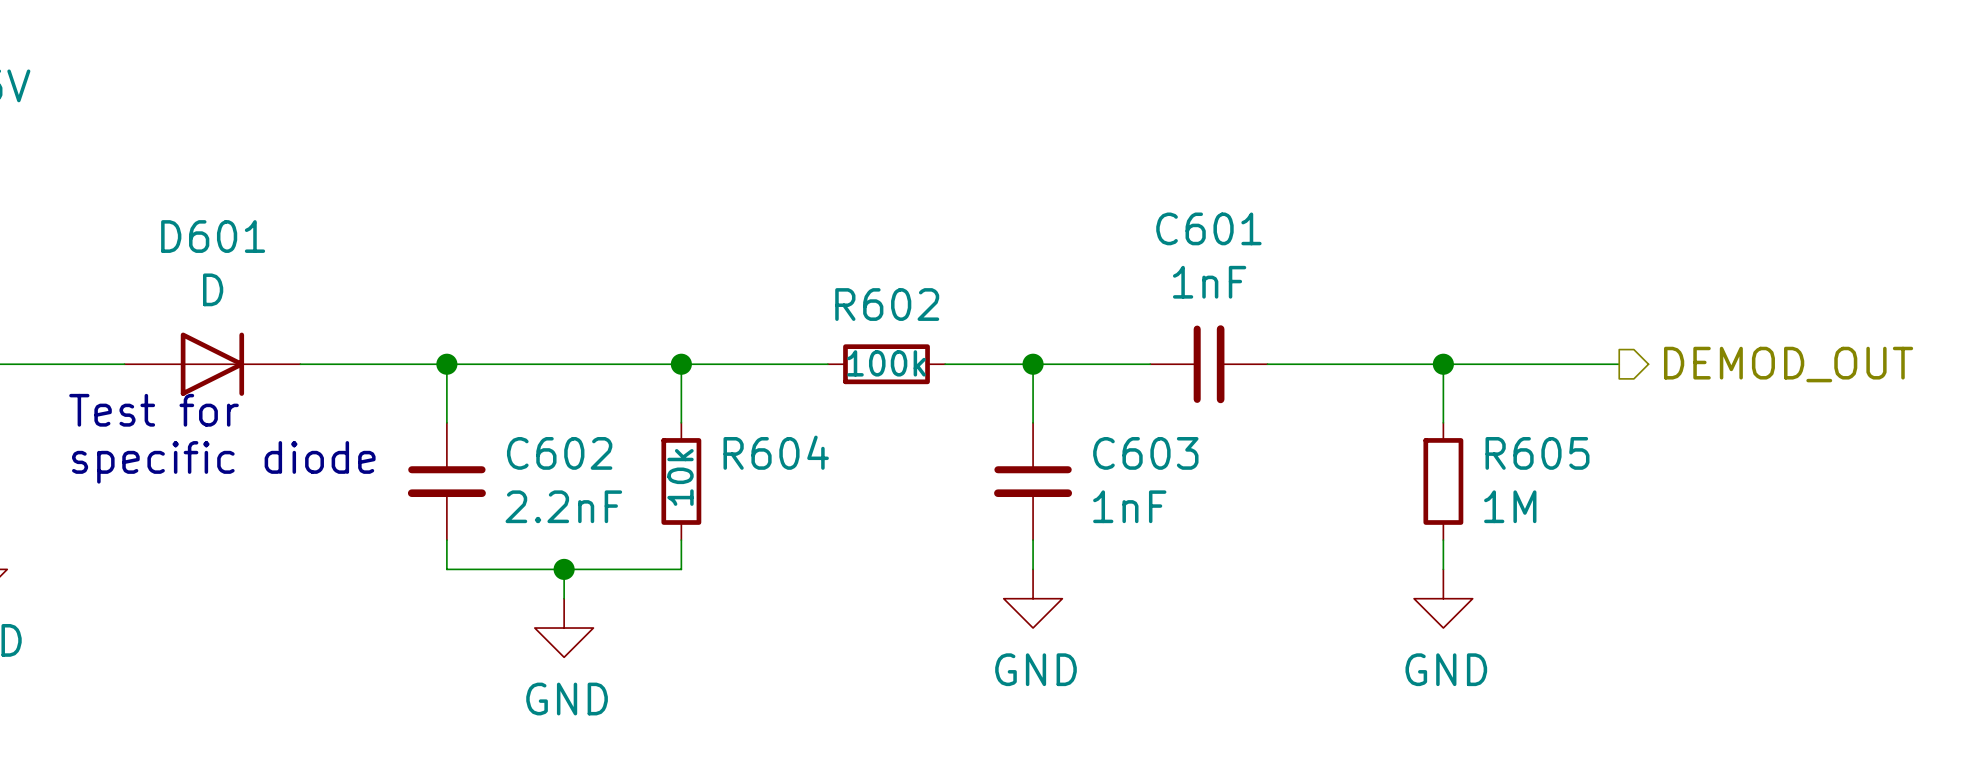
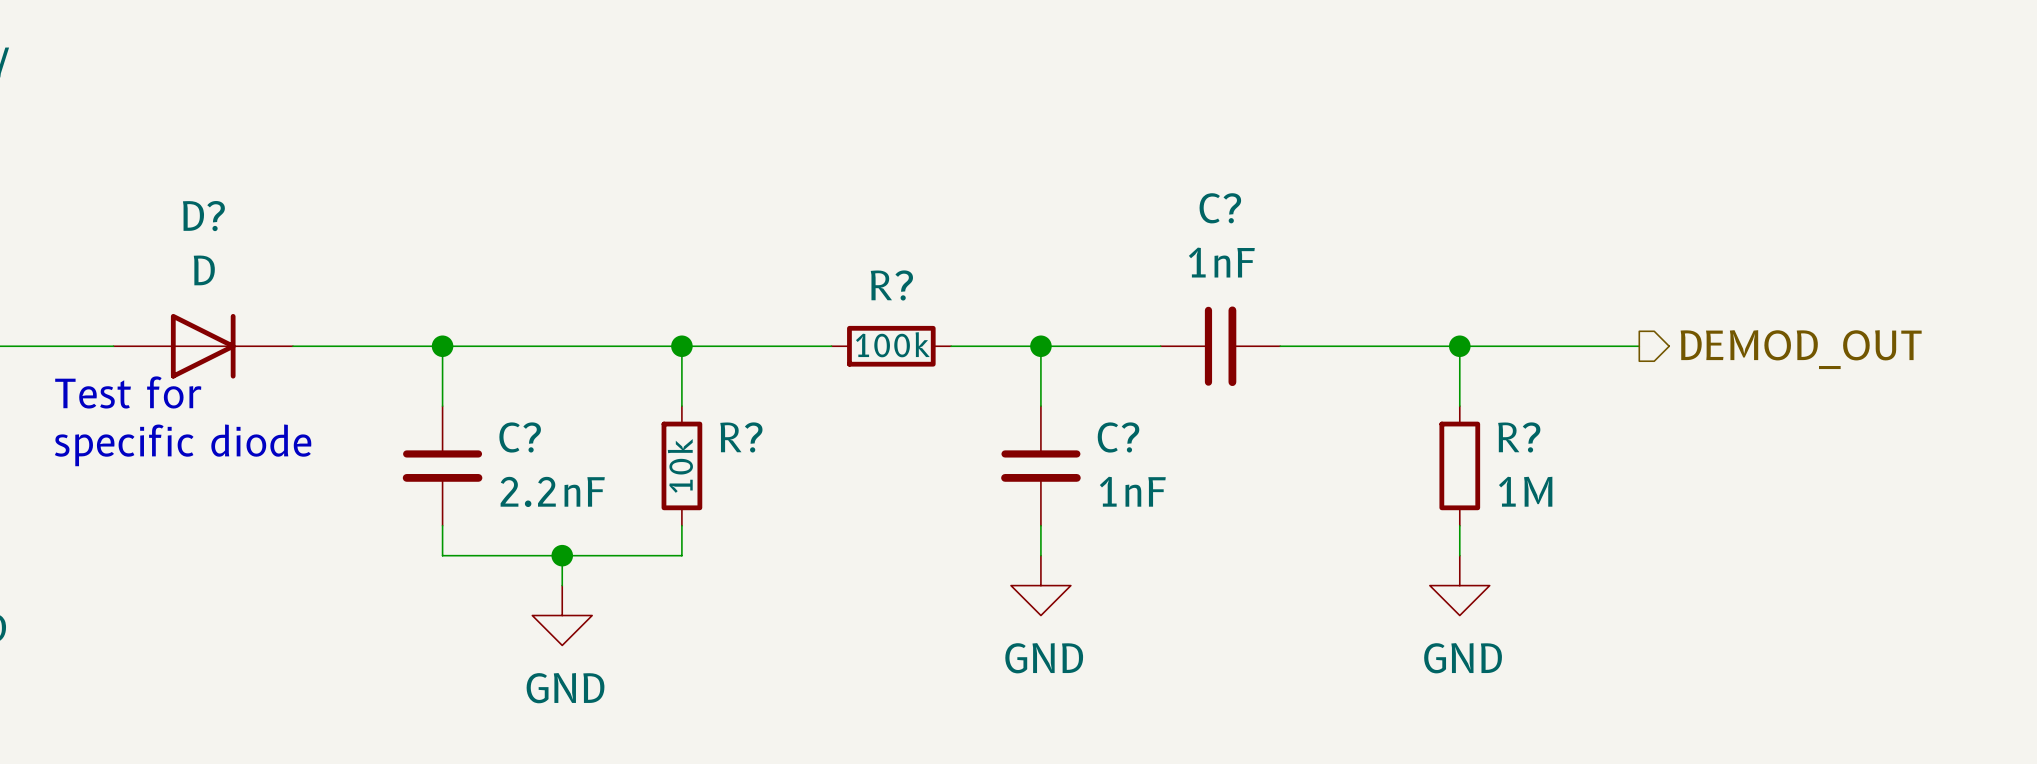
C601 name: C601 (1208, 228) -> C? (1220, 208)
D601 name: D601 (213, 236) -> D? (203, 216)
R602 name: R602 (887, 304) -> R? (891, 285)
R604 name: R604 (776, 452) -> R? (741, 437)
C602 name: C602 (559, 453) -> C? (520, 437)
C603 name: C603 (1145, 453) -> C? (1118, 437)
R605 name: R605 (1537, 453) -> R? (1519, 437)

